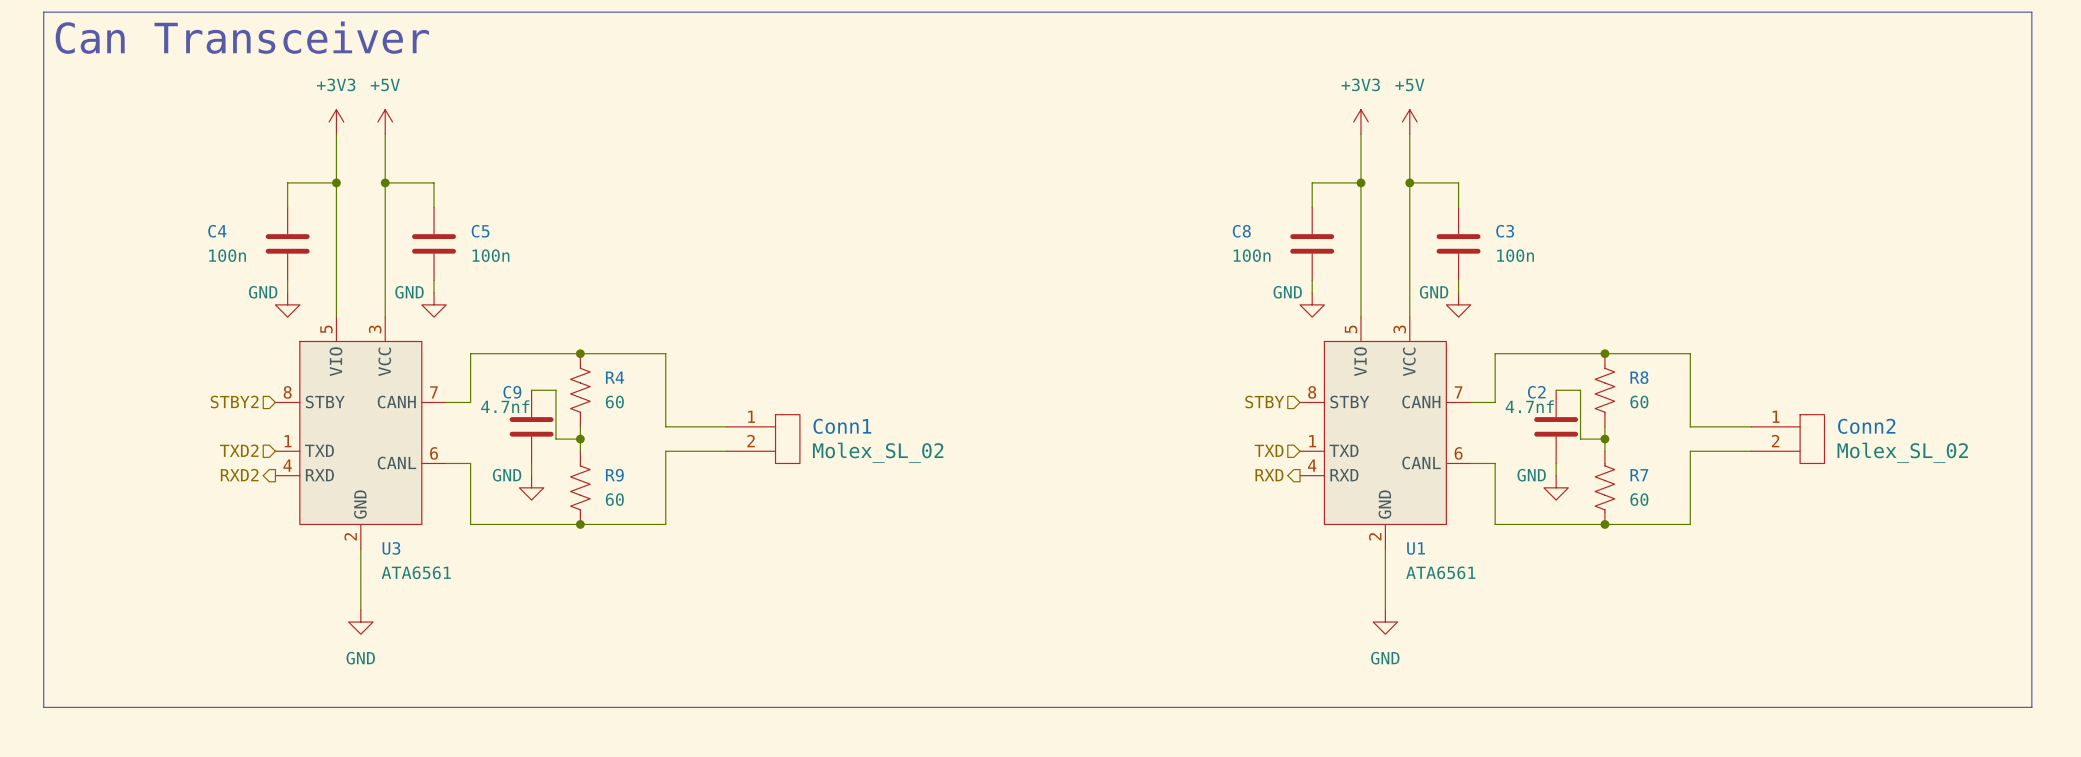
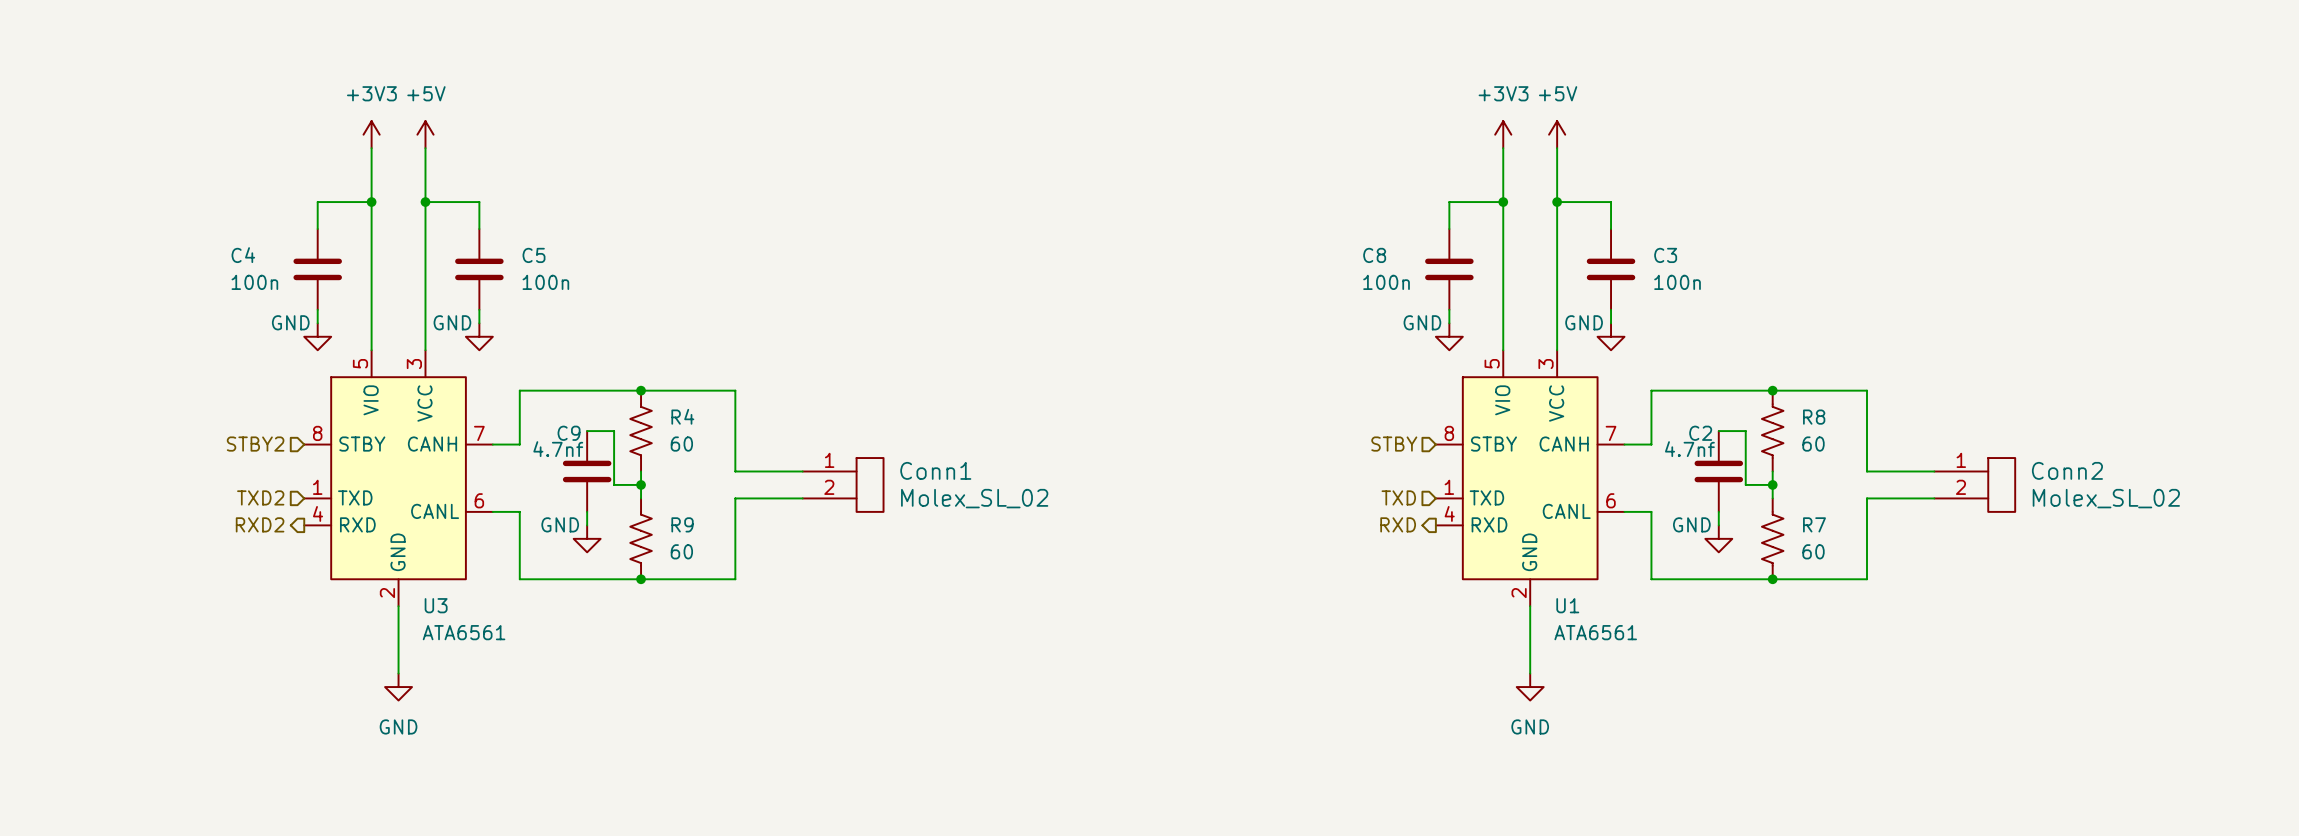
line: (43, 12) (2031, 12) (2031, 707) (43, 707) (43, 12) -> none
text: Can Transceiver (242, 37) -> none

